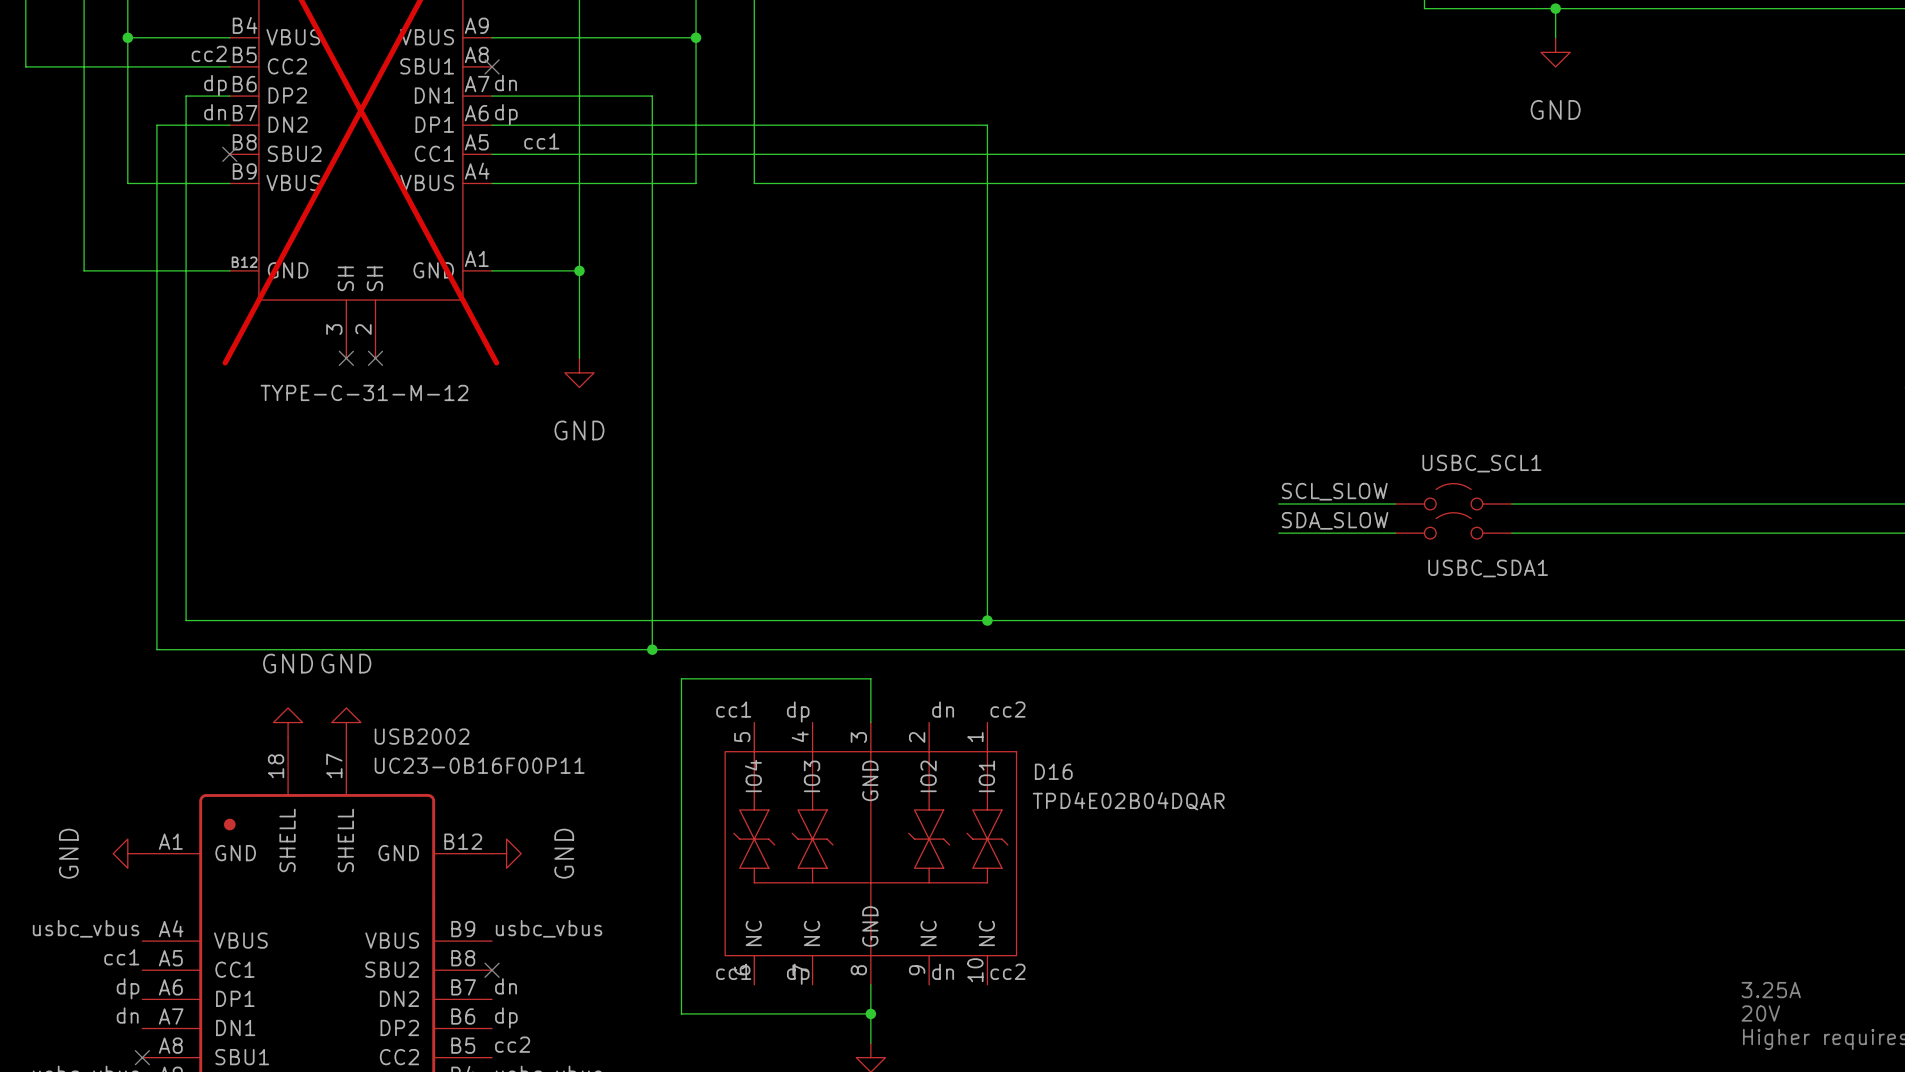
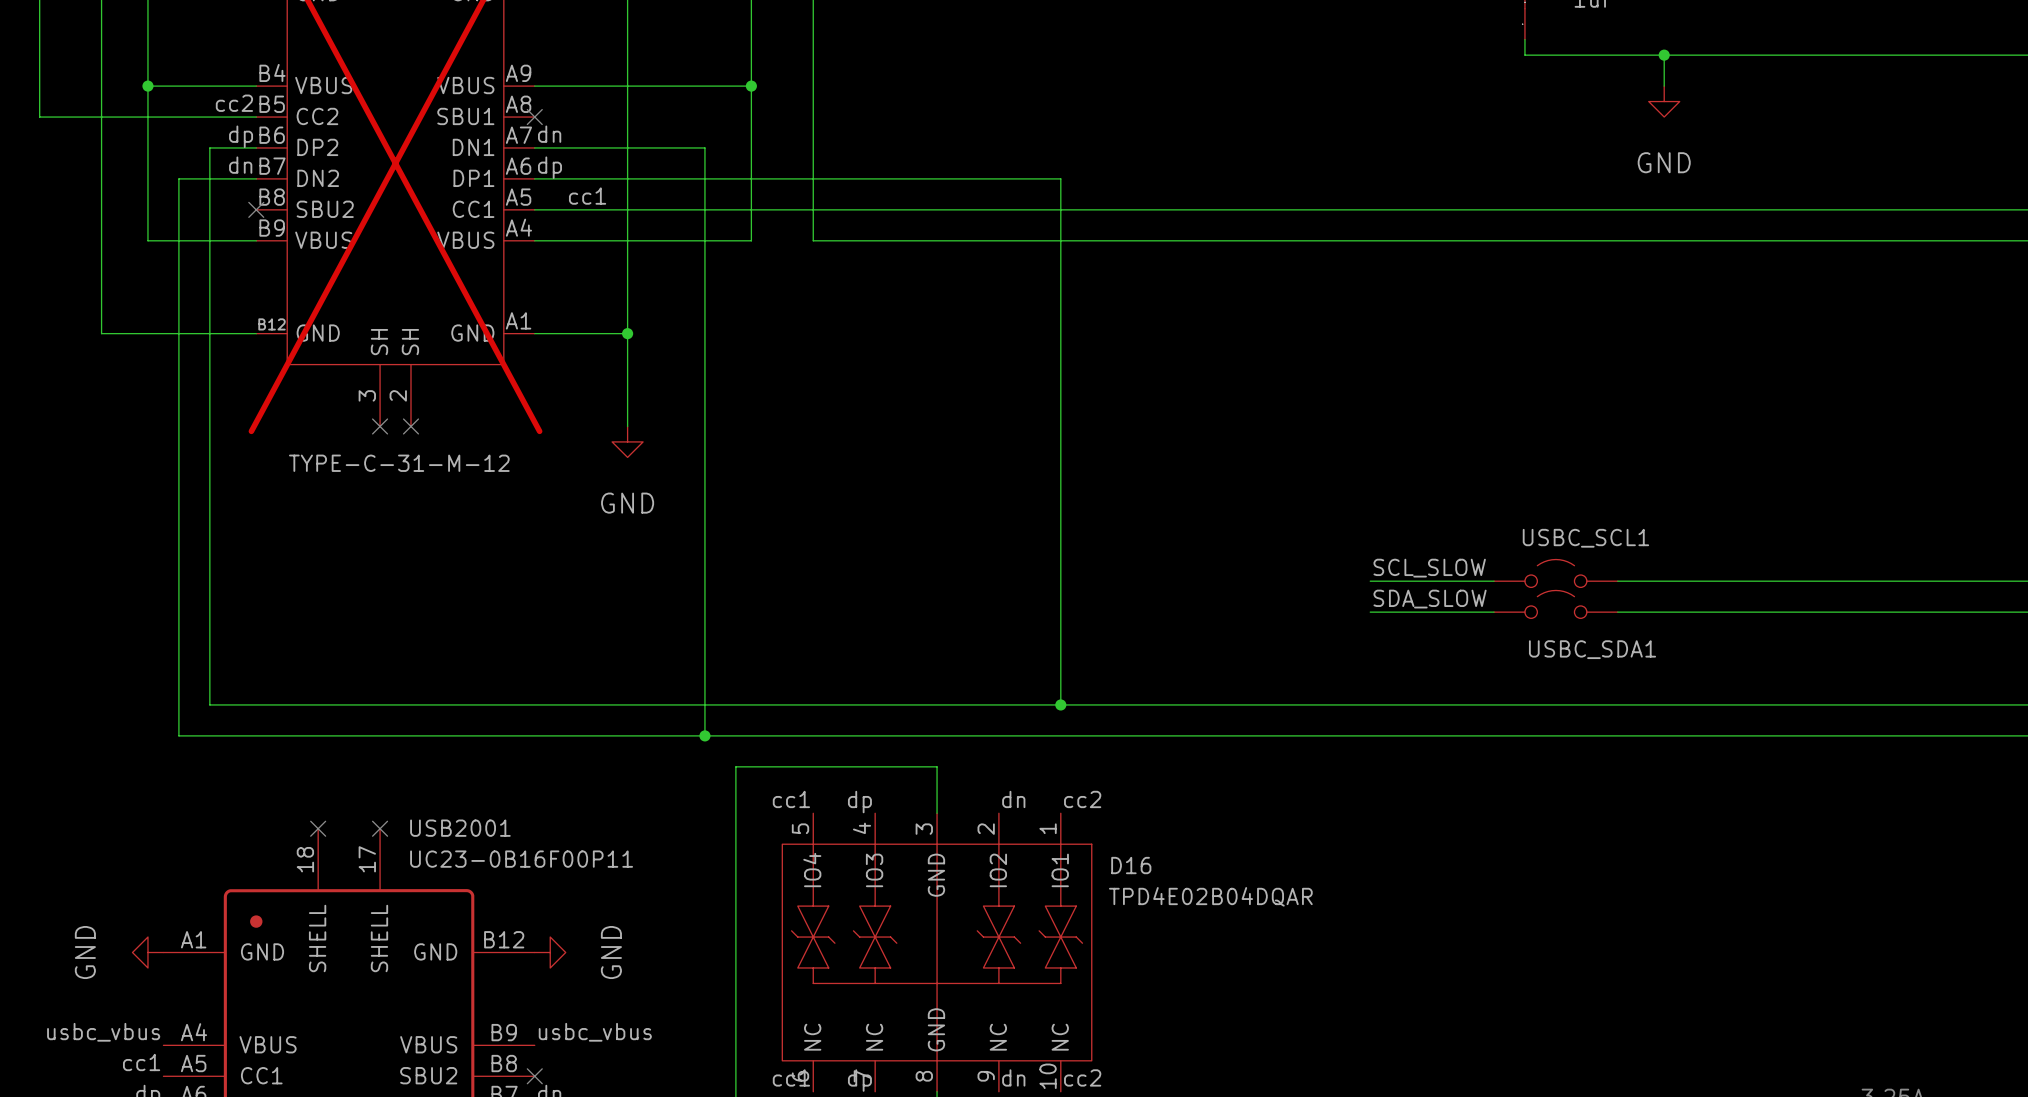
power symbol: GND (288, 722) -> none
power symbol: GND (346, 722) -> none
USB2002 name: USB2002 (422, 736) -> USB2001 (460, 828)
no-connect mark: none -> (318, 828)
no-connect mark: none -> (380, 828)

